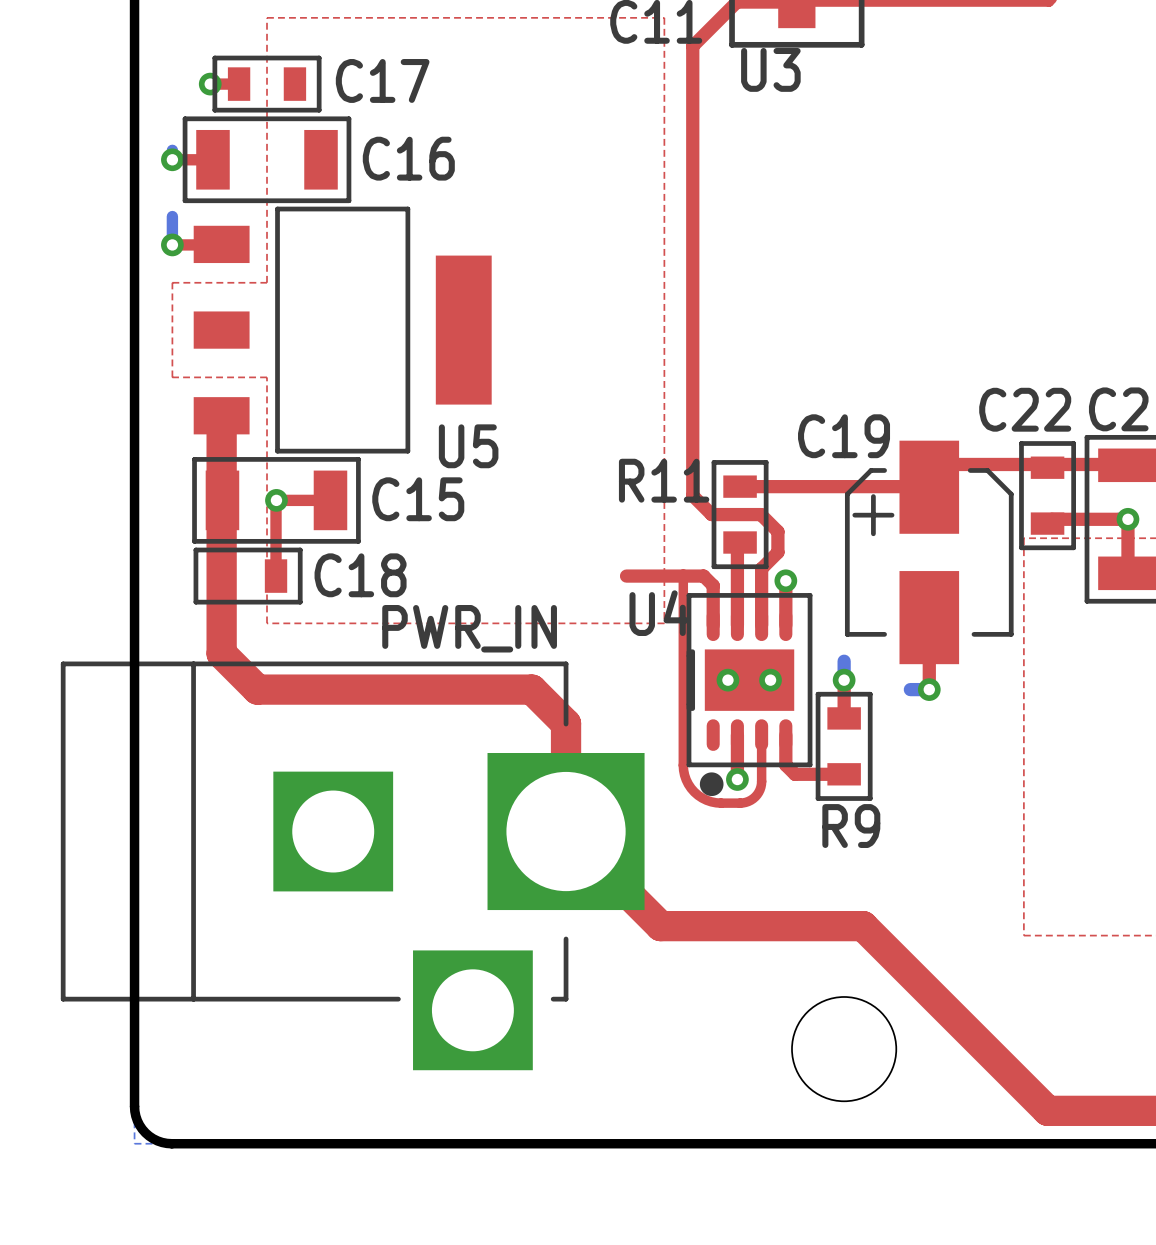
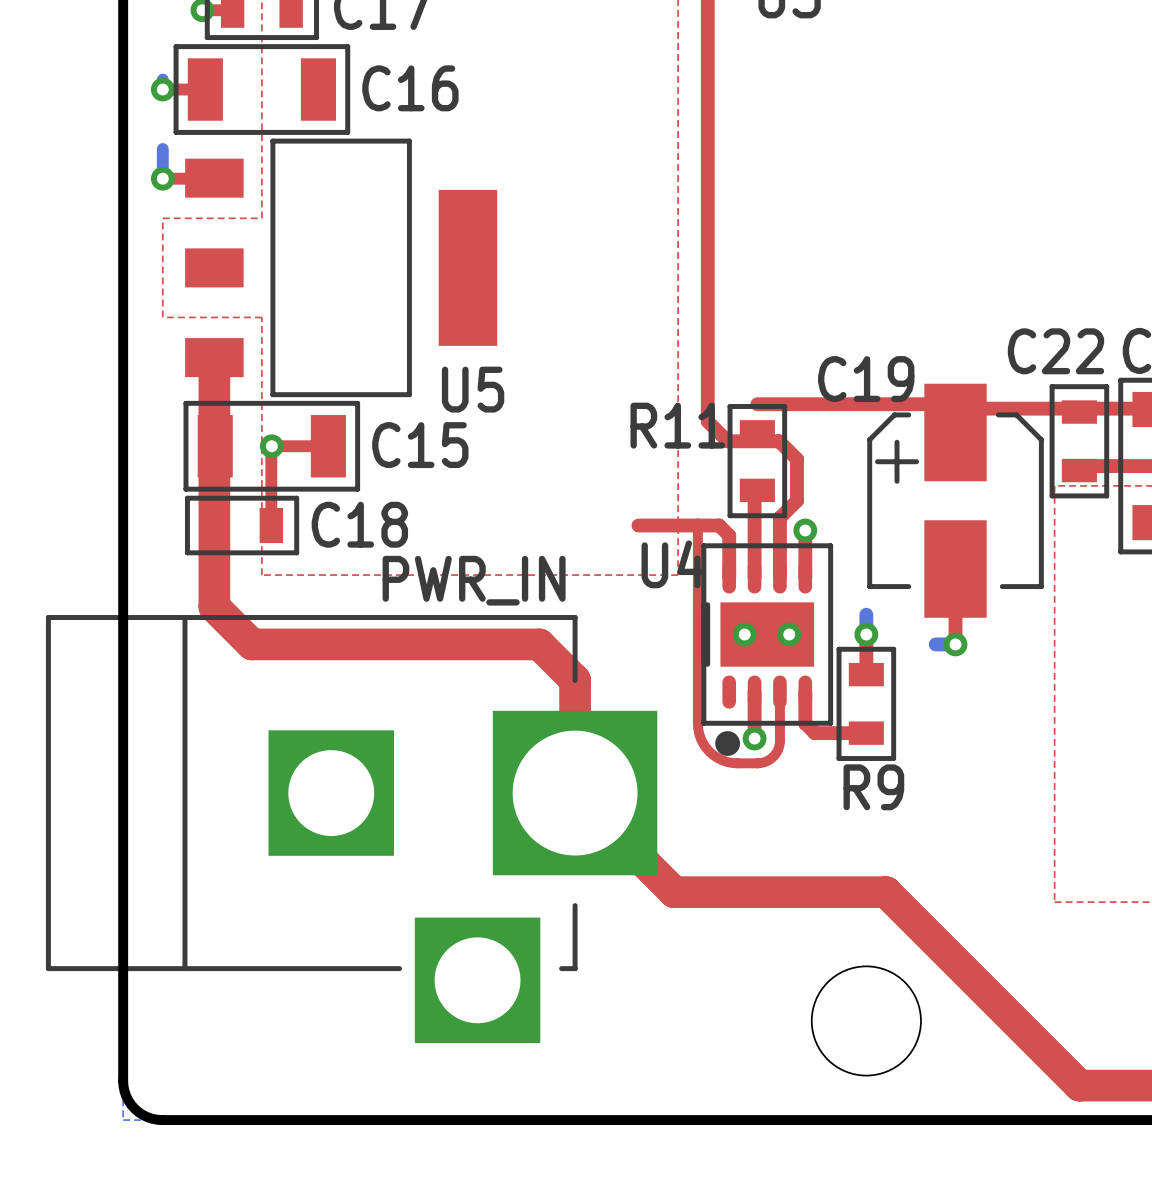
top track: (692, 476) (692, 495) (711, 514) (760, 514) (777, 531) -> (707, 421) (727, 441) (779, 441) (796, 459) (796, 478)
top track: (740, 486) (929, 487) -> (757, 404) (955, 404) (955, 432)

